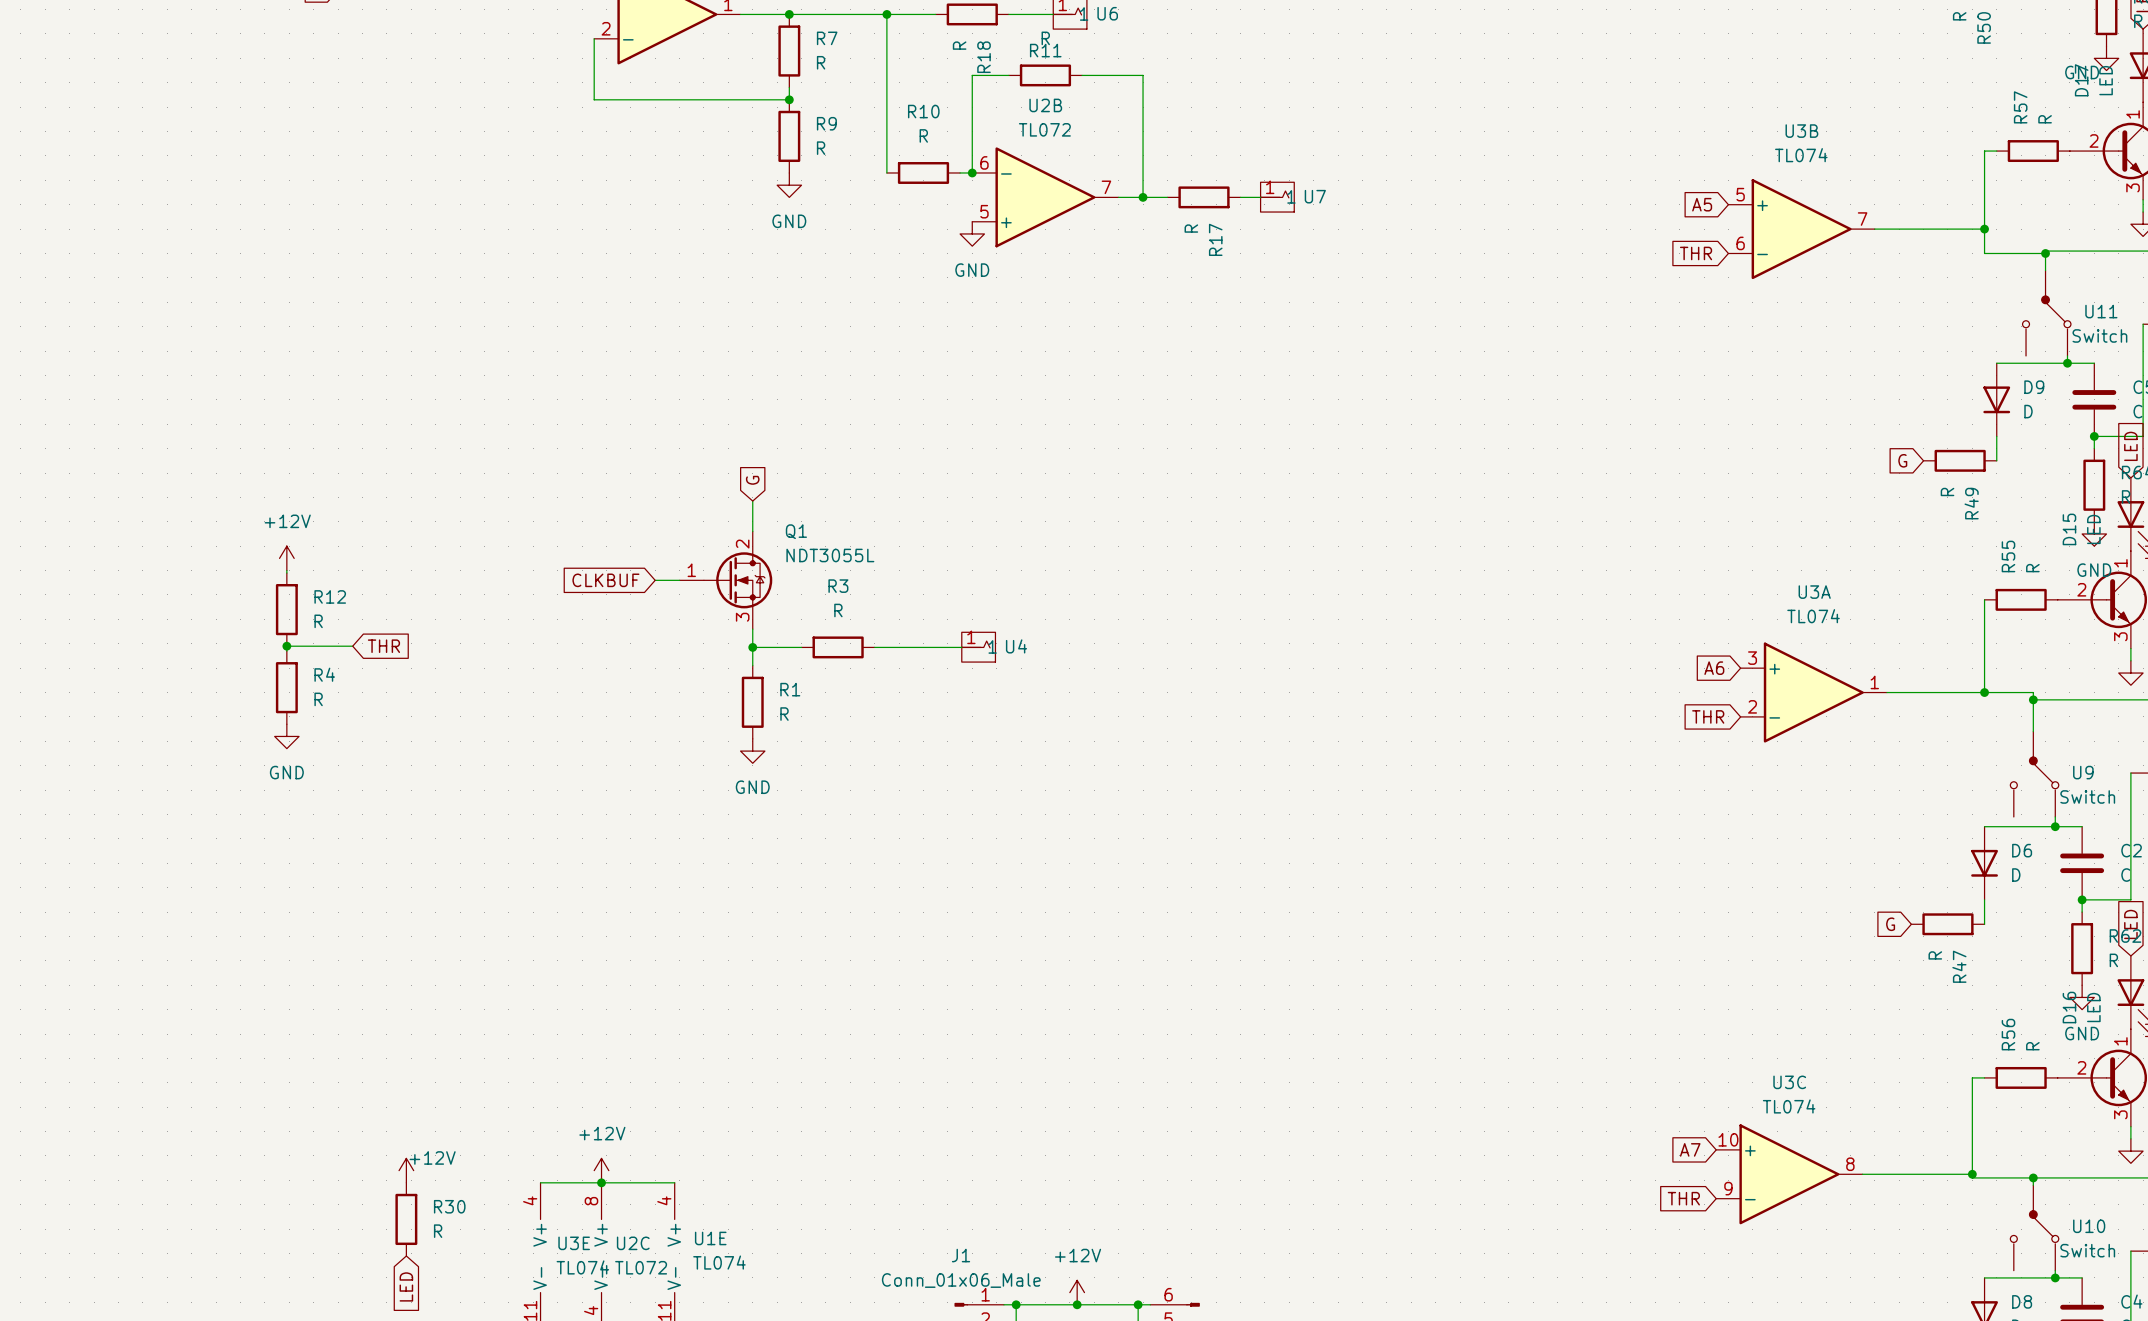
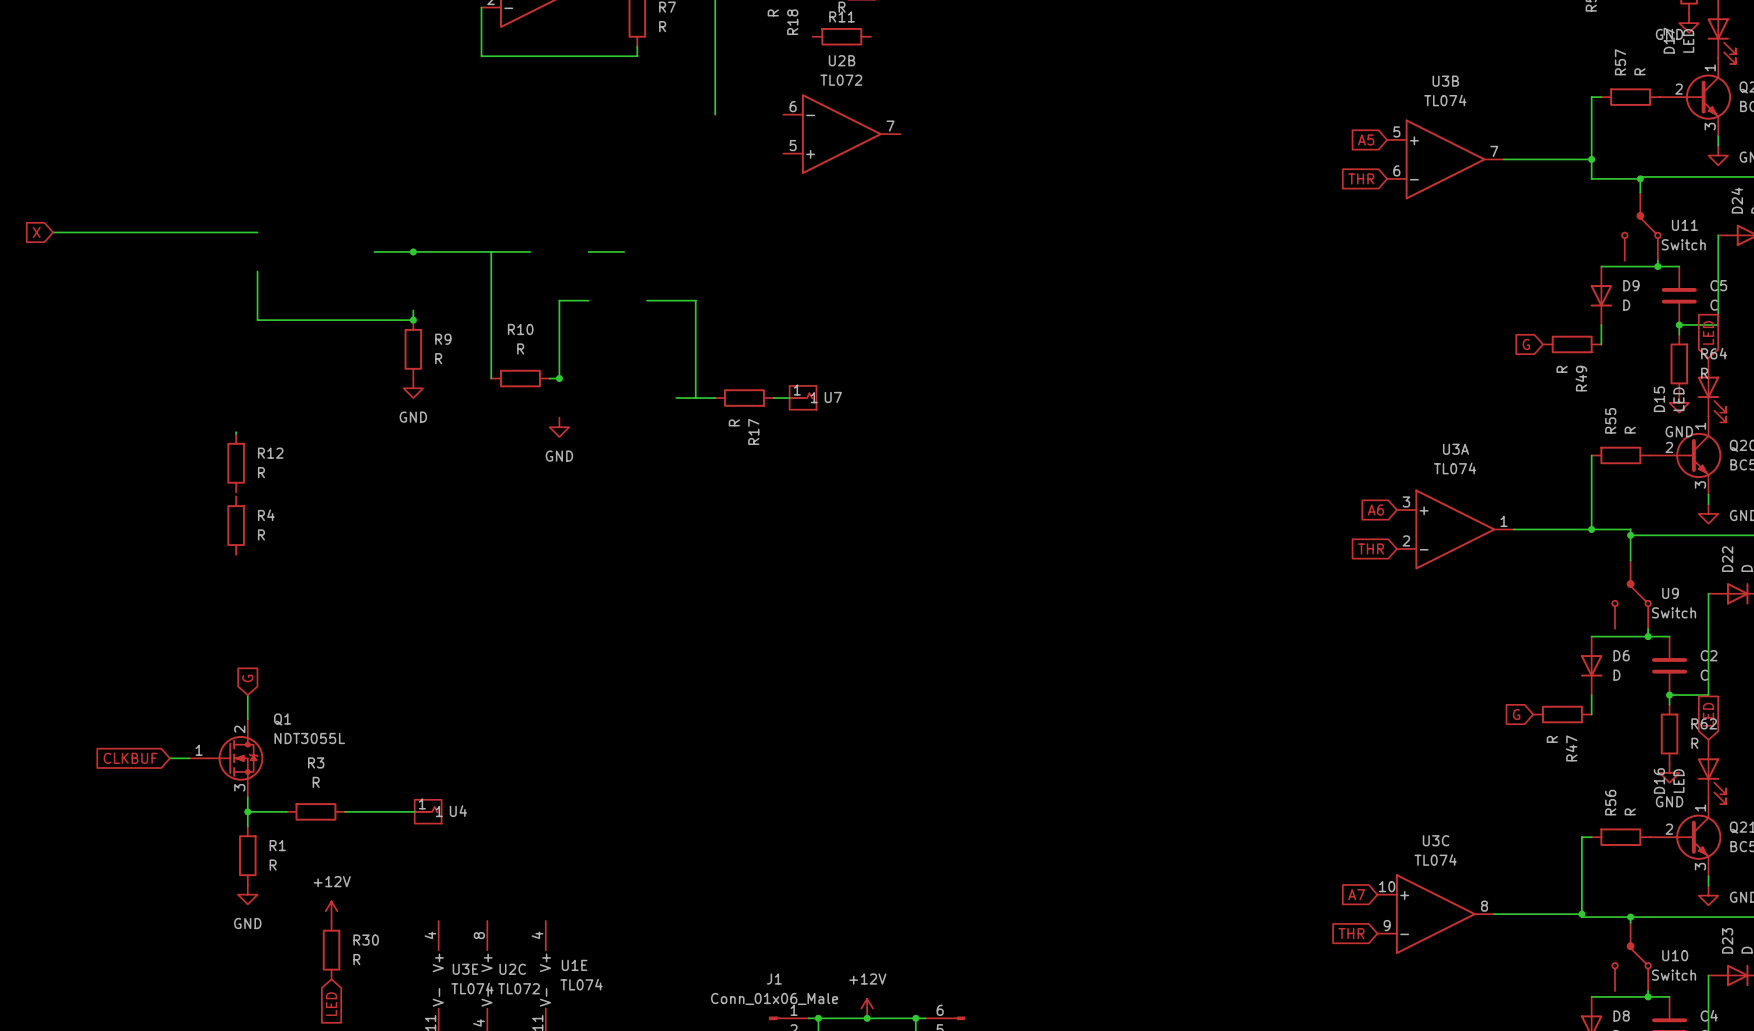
wire: (1008, 75) (972, 75) (972, 172) (960, 172) -> none
wire: (1082, 75) (1143, 75) (1143, 197) -> none
junction: (789, 99) -> none
R9 position: (789, 136) -> (413, 349)
R10 position: (923, 172) -> (520, 378)
junction: (972, 172) -> none
power symbol: GND (789, 185) -> none
wire: (1118, 197) (1167, 197) -> none
junction: (1143, 197) -> none
R17 position: (1204, 197) -> (744, 398)
wire: (1240, 197) (1260, 197) -> none
U7 position: (1277, 197) -> (803, 397)
power symbol: GND (972, 233) -> none
global label: none -> X (36, 232)
wire: none -> (53, 232) (257, 232)
wire: none -> (374, 251) (530, 251)
junction: none -> (413, 251)
wire: none -> (491, 251) (491, 378)
wire: none -> (588, 251) (624, 251)
wire: none -> (257, 271) (257, 320) (413, 320) (413, 310)
wire: none -> (588, 300) (559, 300) (559, 378) (549, 378)
wire: none -> (647, 300) (695, 300) (695, 398)
junction: none -> (413, 320)
global label: G (752, 480) -> none
wire: (752, 501) (752, 531) -> none
junction: none -> (559, 378)
power symbol: none -> GND (413, 388)
wire: none -> (773, 398) (789, 398)
power symbol: +12V (286, 558) -> none
power symbol: none -> GND (559, 427)
global label: CLKBUF (605, 580) -> none
wire: (655, 580) (679, 580) -> none
Q1 position: (725, 580) -> (226, 758)
wire: (752, 629) (752, 665) -> none
junction: (286, 646) -> none
wire: (352, 646) (286, 646) (286, 651) -> none
global label: THR (383, 646) -> none
wire: (752, 647) (801, 647) -> (676, 398) (715, 398)
junction: (752, 647) -> none
R3 position: (838, 647) -> (315, 811)
wire: (874, 647) (961, 647) -> none
U4 position: (978, 647) -> (428, 811)
R1 position: (752, 702) -> (247, 855)
power symbol: GND (286, 736) -> none
power symbol: GND (752, 751) -> none
global label: none -> G (247, 678)
wire: none -> (247, 695) (247, 719)
global label: none -> CLKBUF (130, 758)
wire: none -> (169, 758) (189, 758)
wire: none -> (247, 797) (247, 826)
wire: none -> (247, 811) (286, 811)
junction: none -> (247, 811)
wire: none -> (345, 811) (414, 811)
power symbol: none -> GND (247, 894)
power symbol text position: +12V (432, 1157) -> +12V (332, 881)
power symbol: +12V (601, 1170) -> none
wire: (540, 1182) (674, 1182) -> none
junction: (601, 1182) -> none

